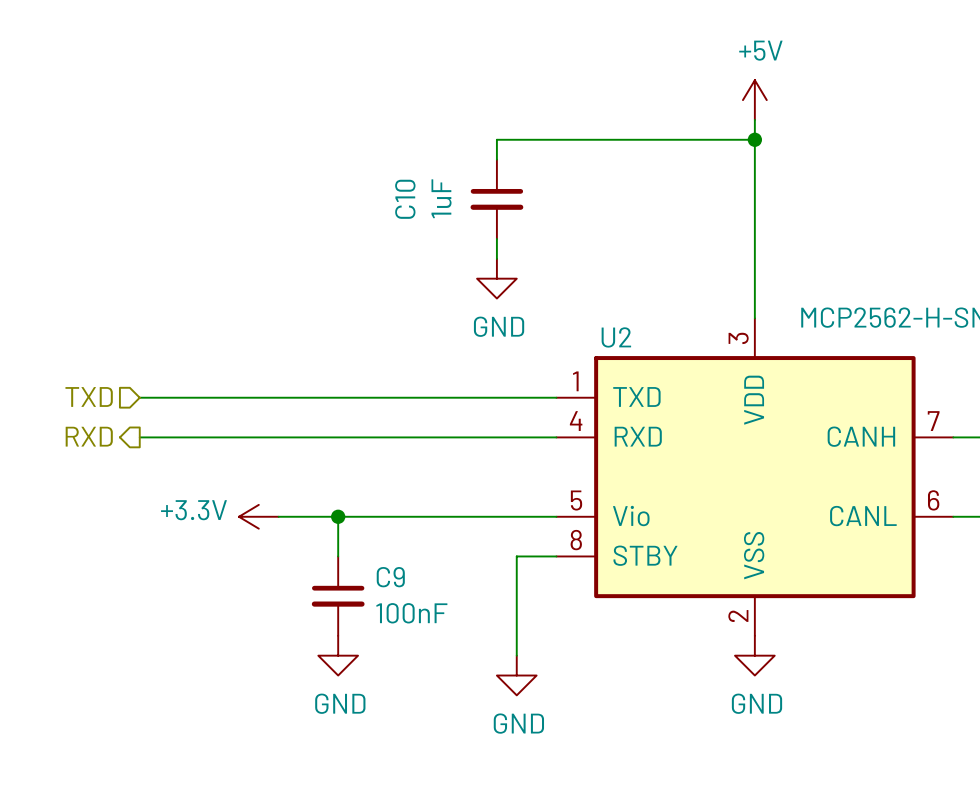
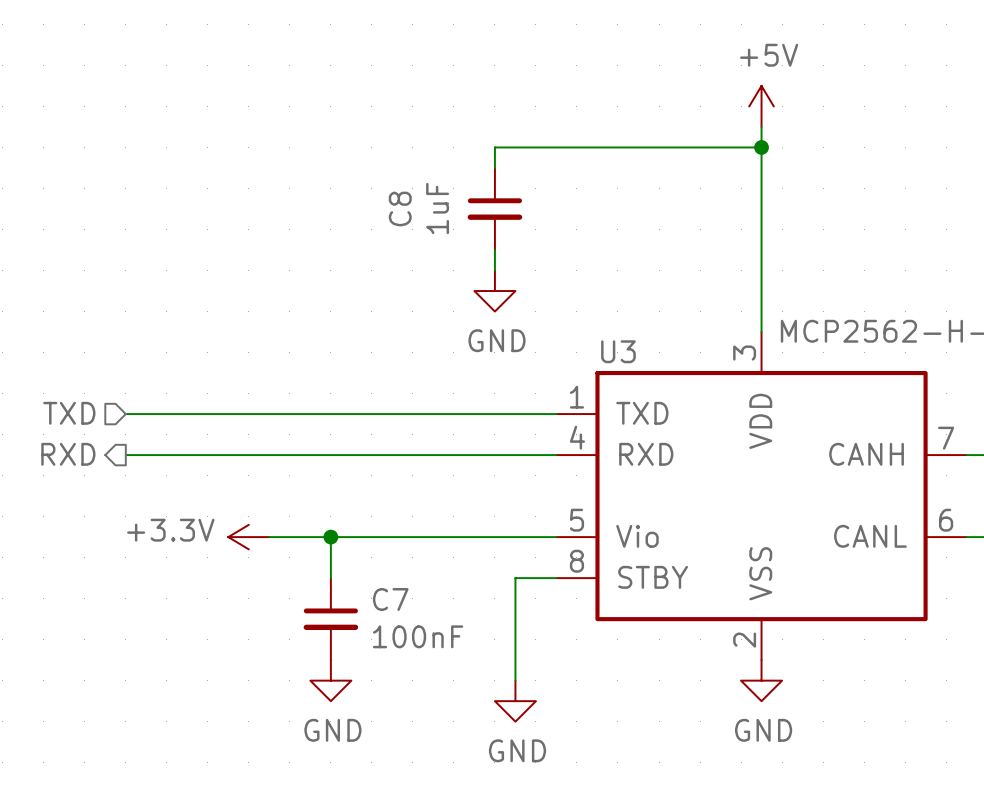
C10 name: C10 (405, 199) -> C8 (400, 208)
U2 name: U2 (616, 337) -> U3 (618, 351)
C9 name: C9 (390, 577) -> C7 (390, 599)

